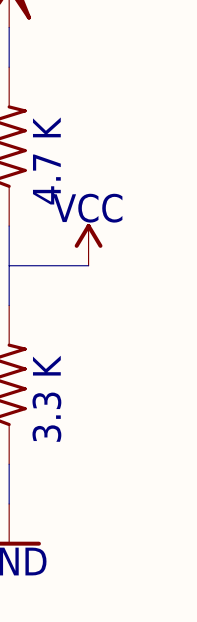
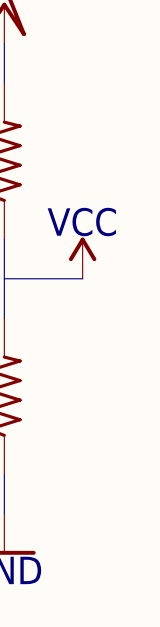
part value: 4.7 K (46, 160) -> none
part value: 3.3 K (46, 398) -> none

